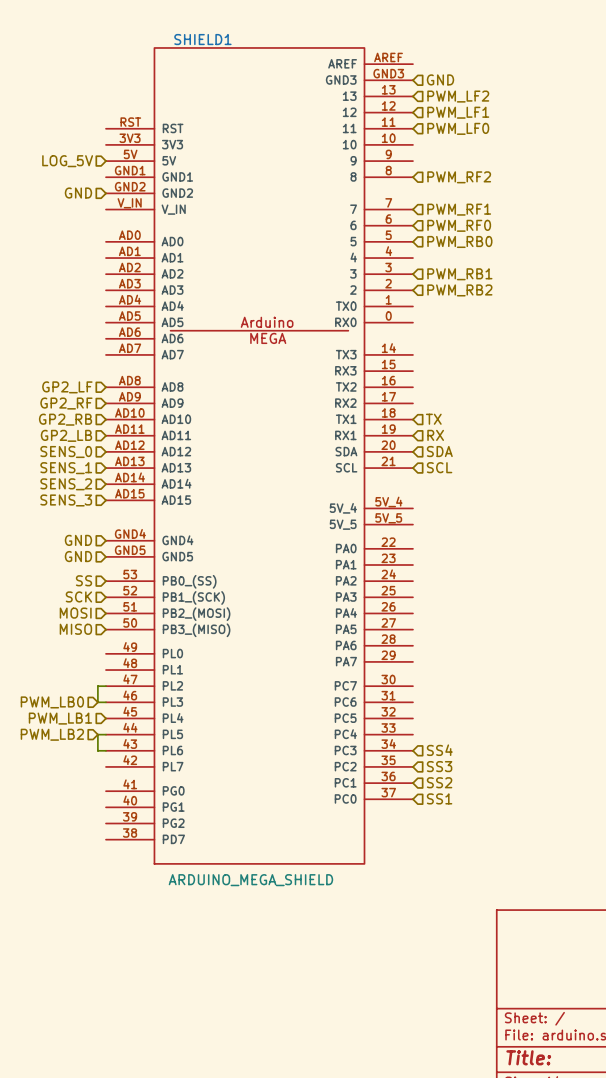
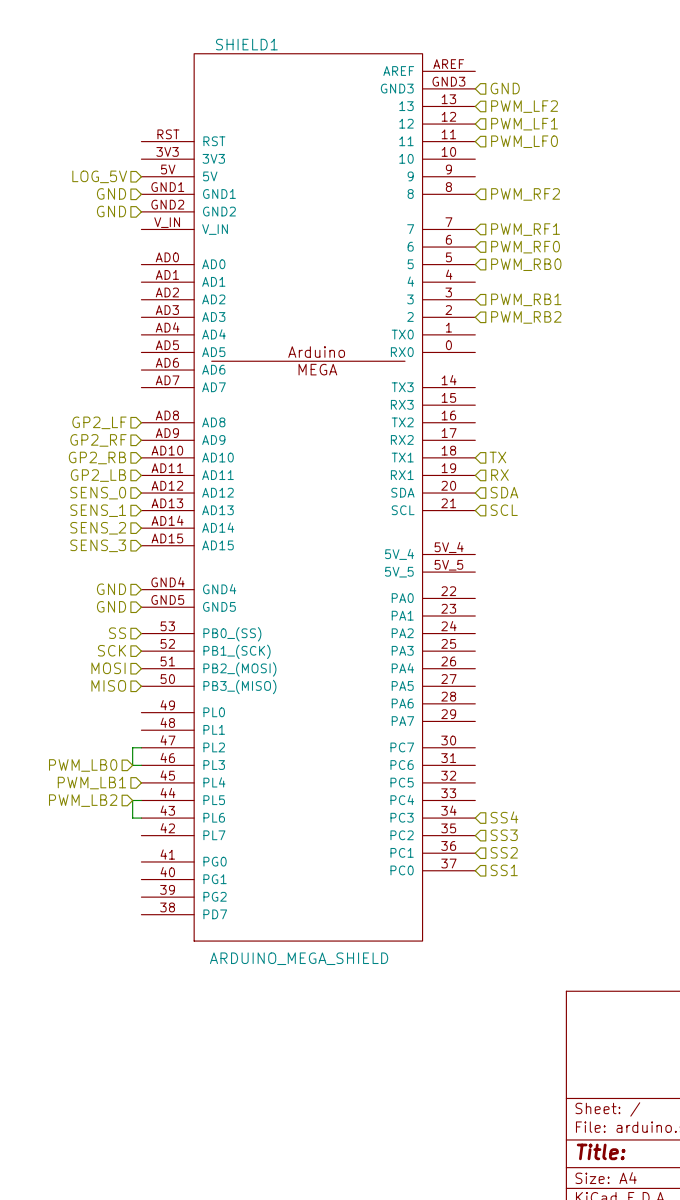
hierarchical label: none -> GND (111, 193)

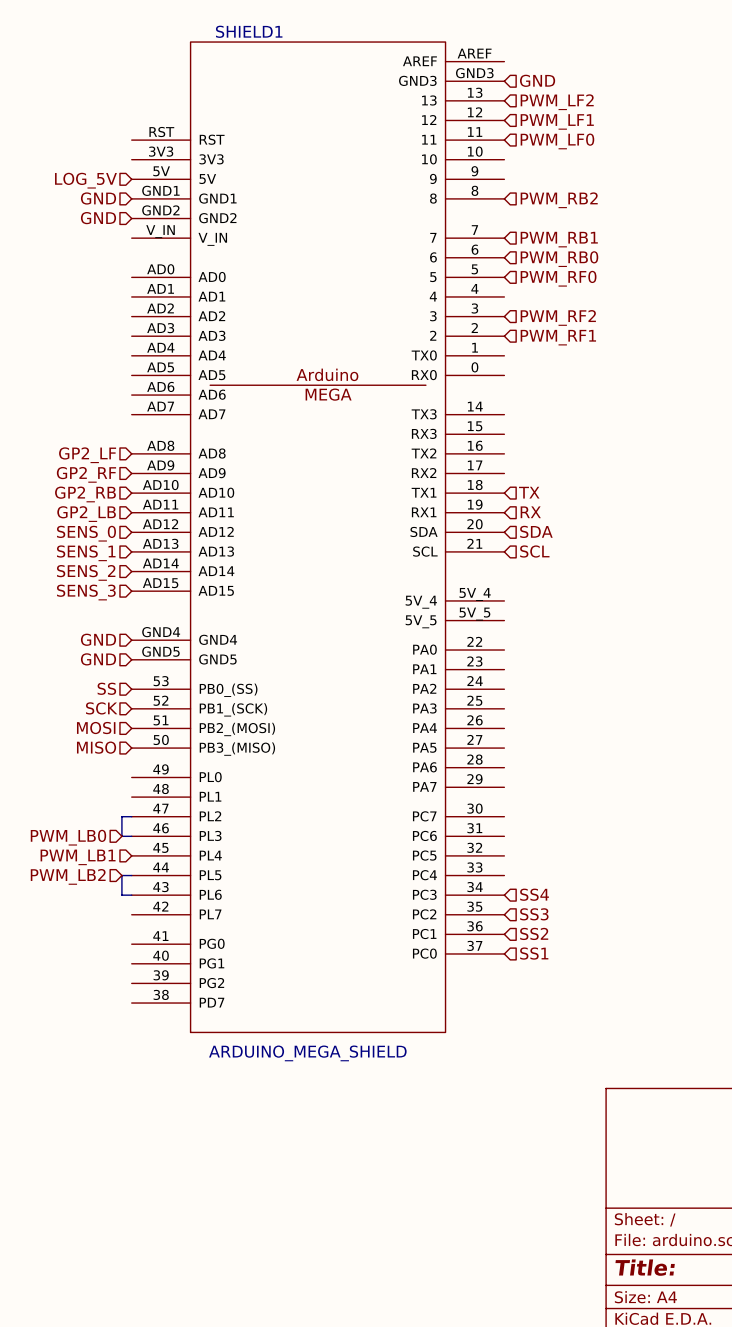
hierarchical label: PWM_RF2 (525, 194) -> PWM_RB2 (559, 200)
hierarchical label: PWM_RF1 (525, 229) -> PWM_RB1 (559, 239)
hierarchical label: PWM_RF0 (525, 247) -> PWM_RB0 (559, 259)
hierarchical label: PWM_RB0 (526, 264) -> PWM_RF0 (558, 278)
hierarchical label: PWM_RB1 (526, 299) -> PWM_RF2 (558, 317)
hierarchical label: PWM_RB2 (526, 317) -> PWM_RF1 (558, 337)

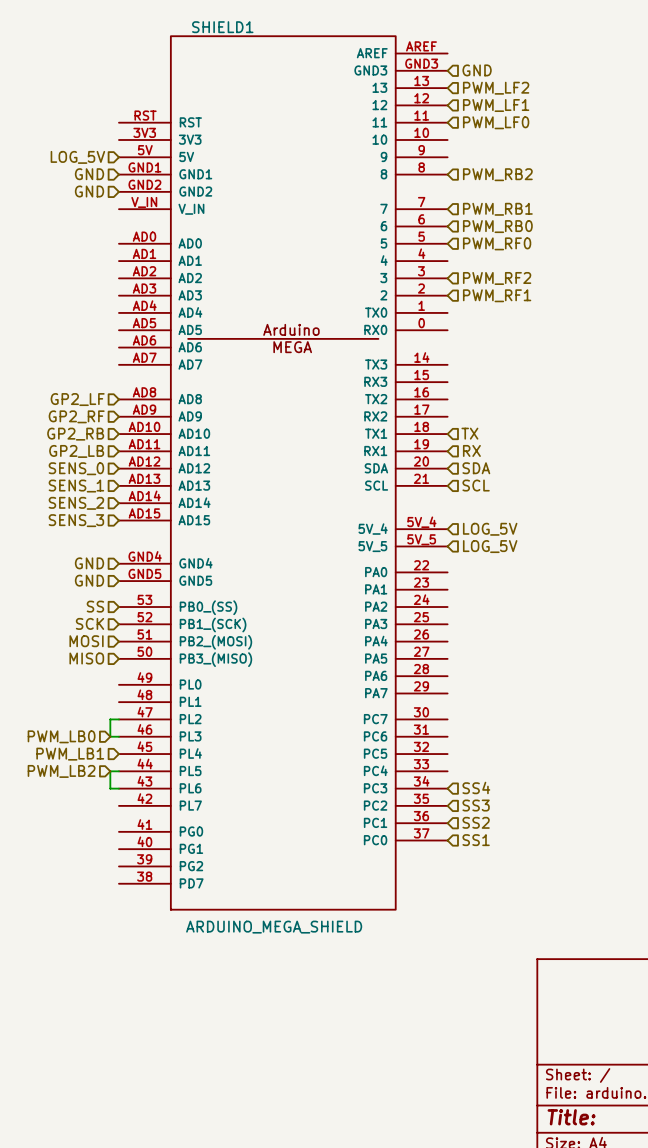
hierarchical label: none -> LOG_5V (490, 529)
hierarchical label: none -> LOG_5V (490, 546)

